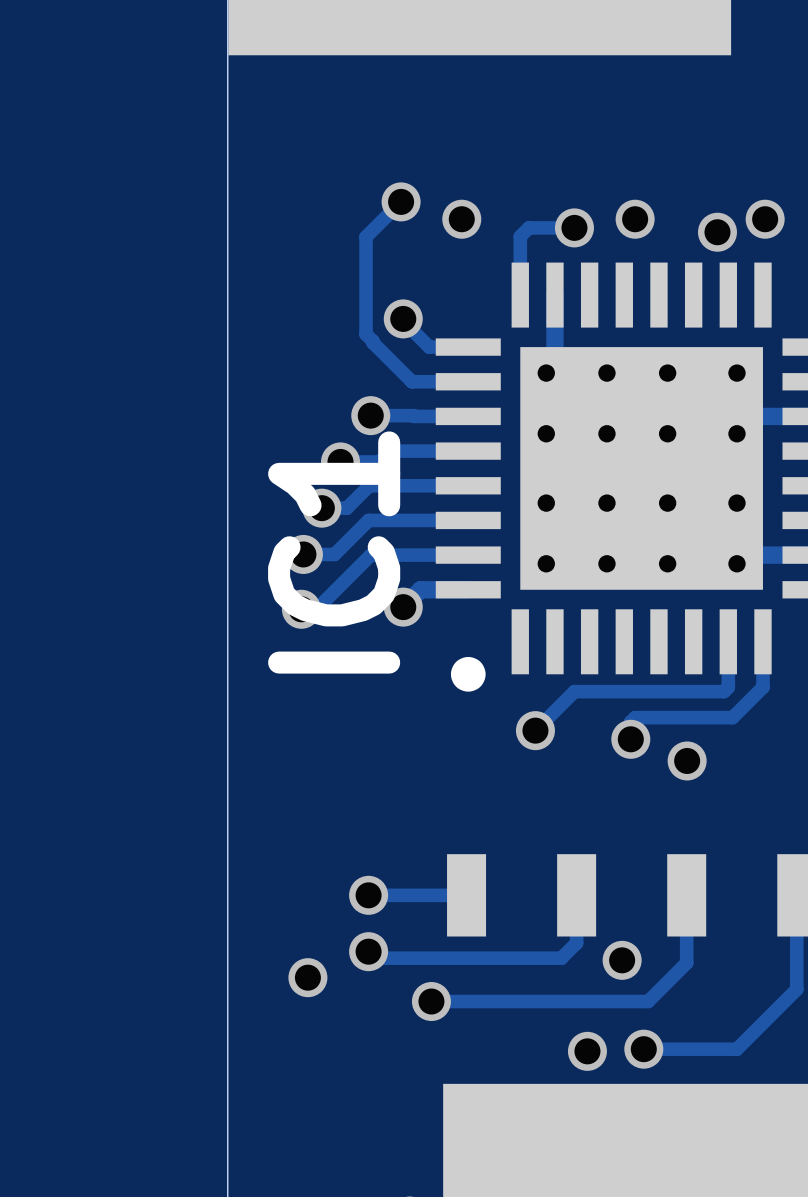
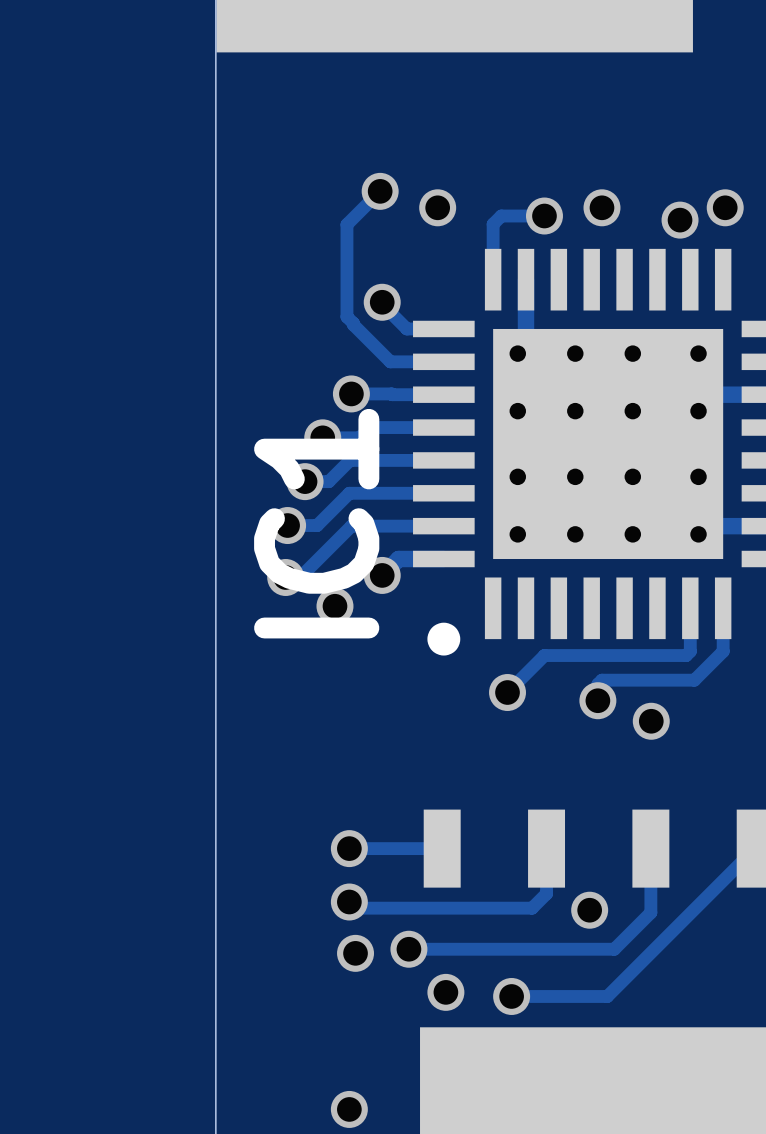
via: none -> (334, 606)
track: (796, 895) (796, 989) (736, 1049) (643, 1049) -> (755, 848) (607, 996) (511, 996)
via position: (307, 977) -> (355, 953)
via: none -> (445, 992)
via: (643, 1049) -> none
via position: (587, 1051) -> (511, 996)
via: none -> (349, 1109)

